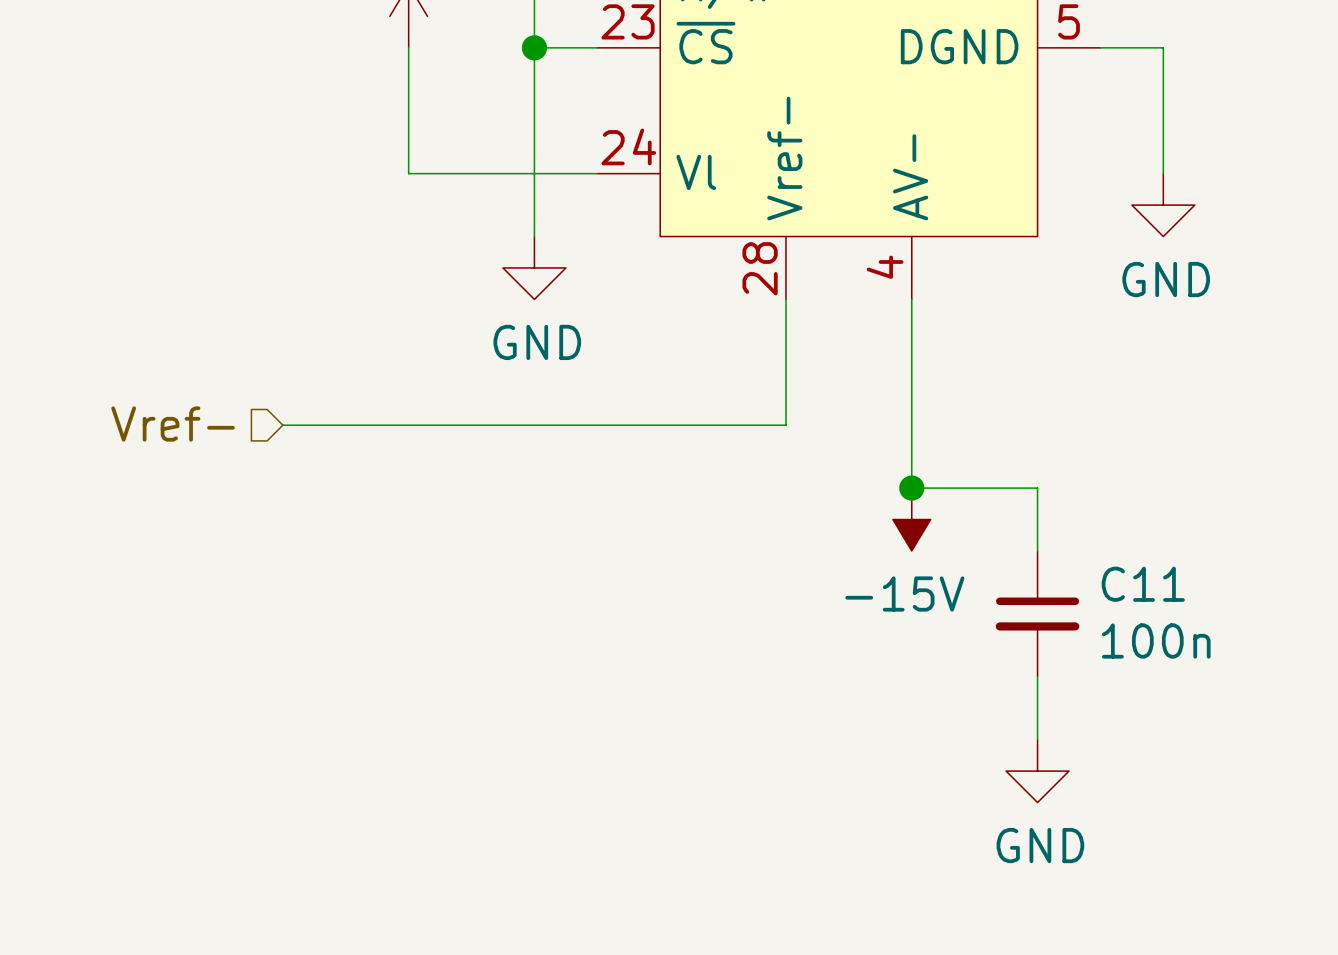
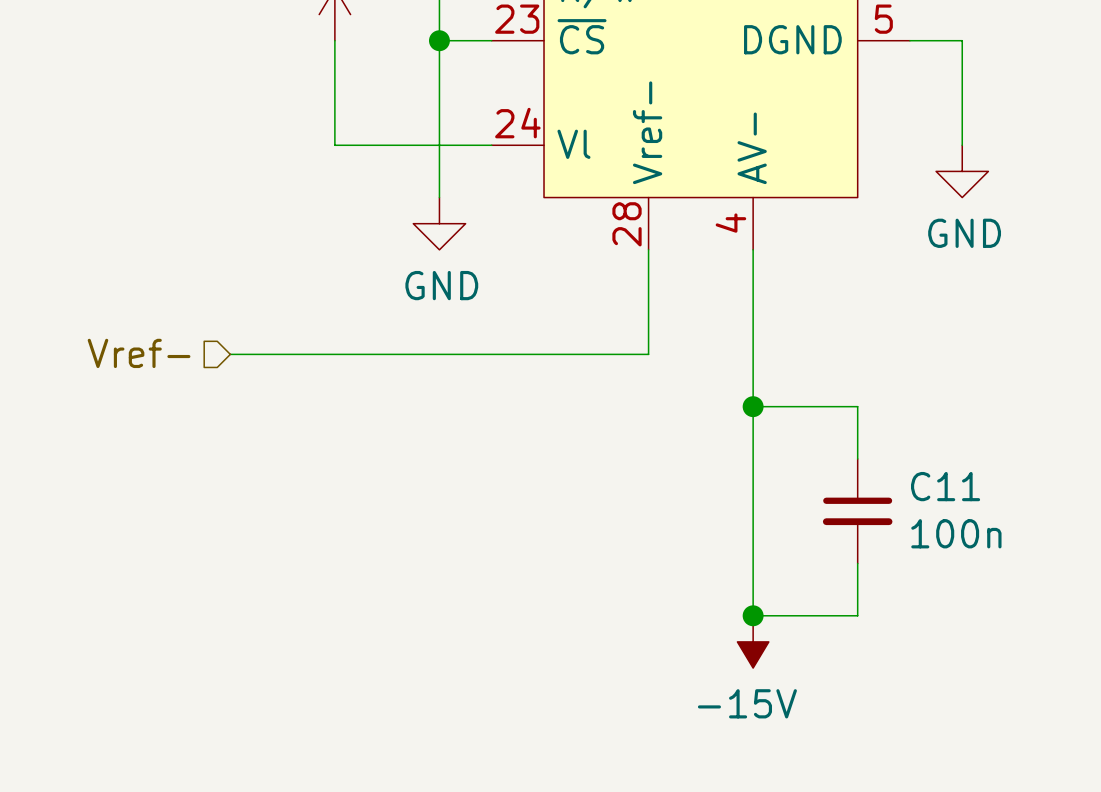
wire: none -> (753, 406) (753, 615) (857, 615)
power symbol position: -15V (911, 519) -> -15V (753, 641)
junction: none -> (753, 615)
power symbol: GND (1037, 771) -> none

